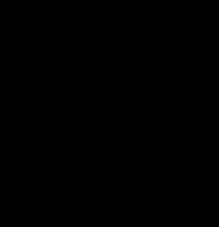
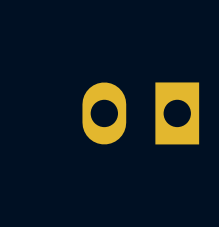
part: none -> (140, 113)

